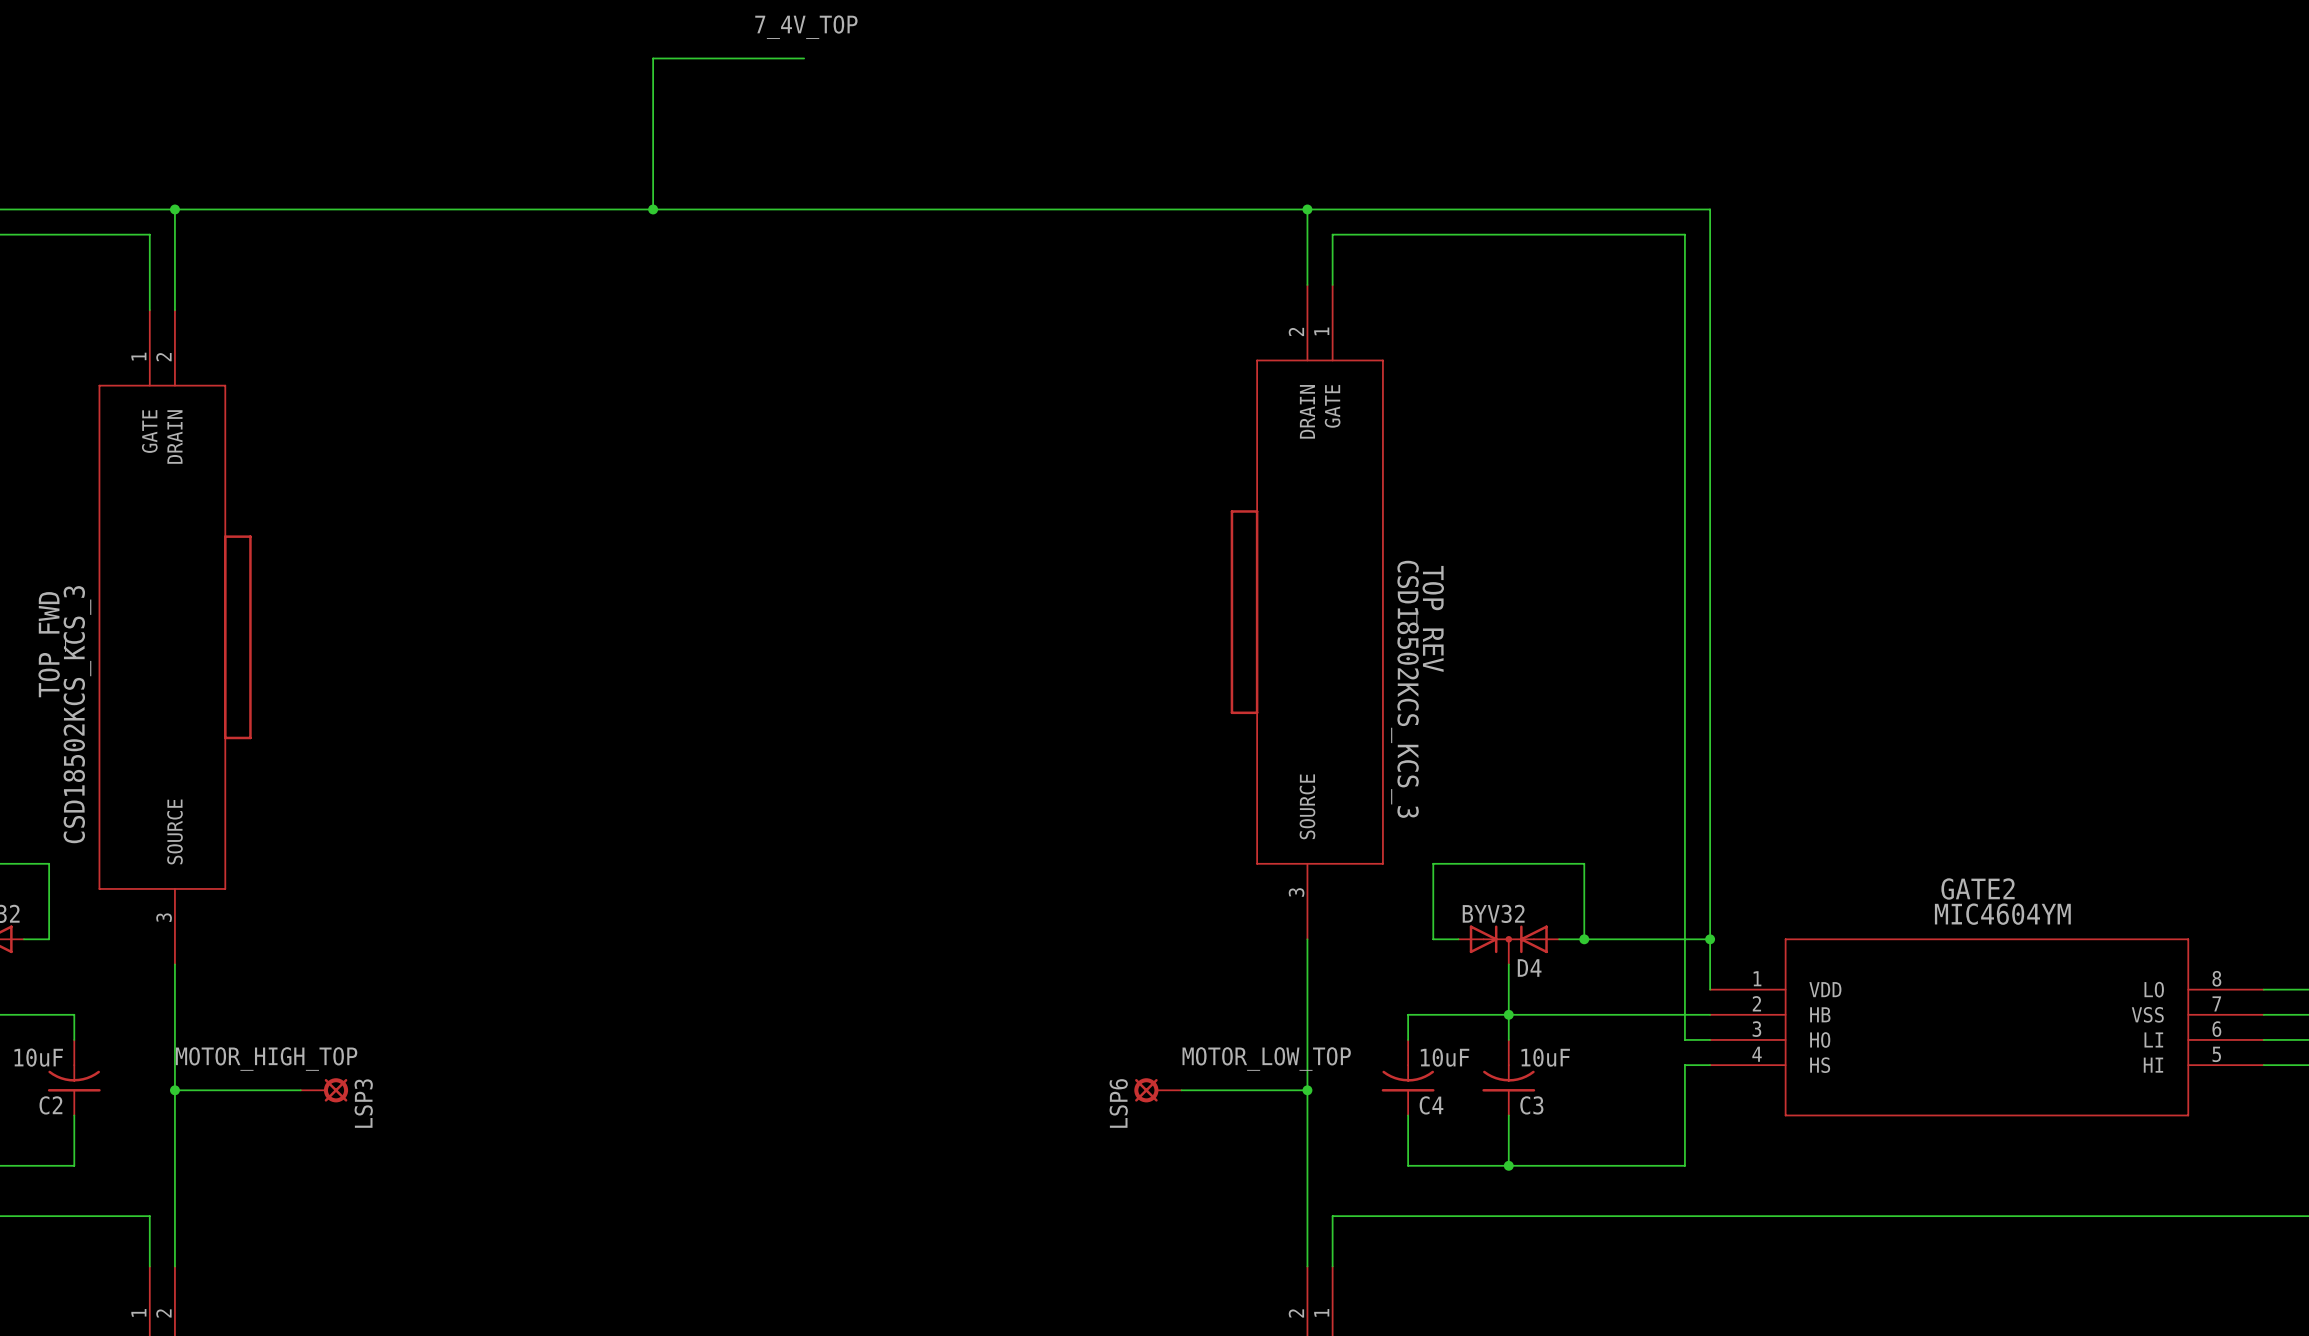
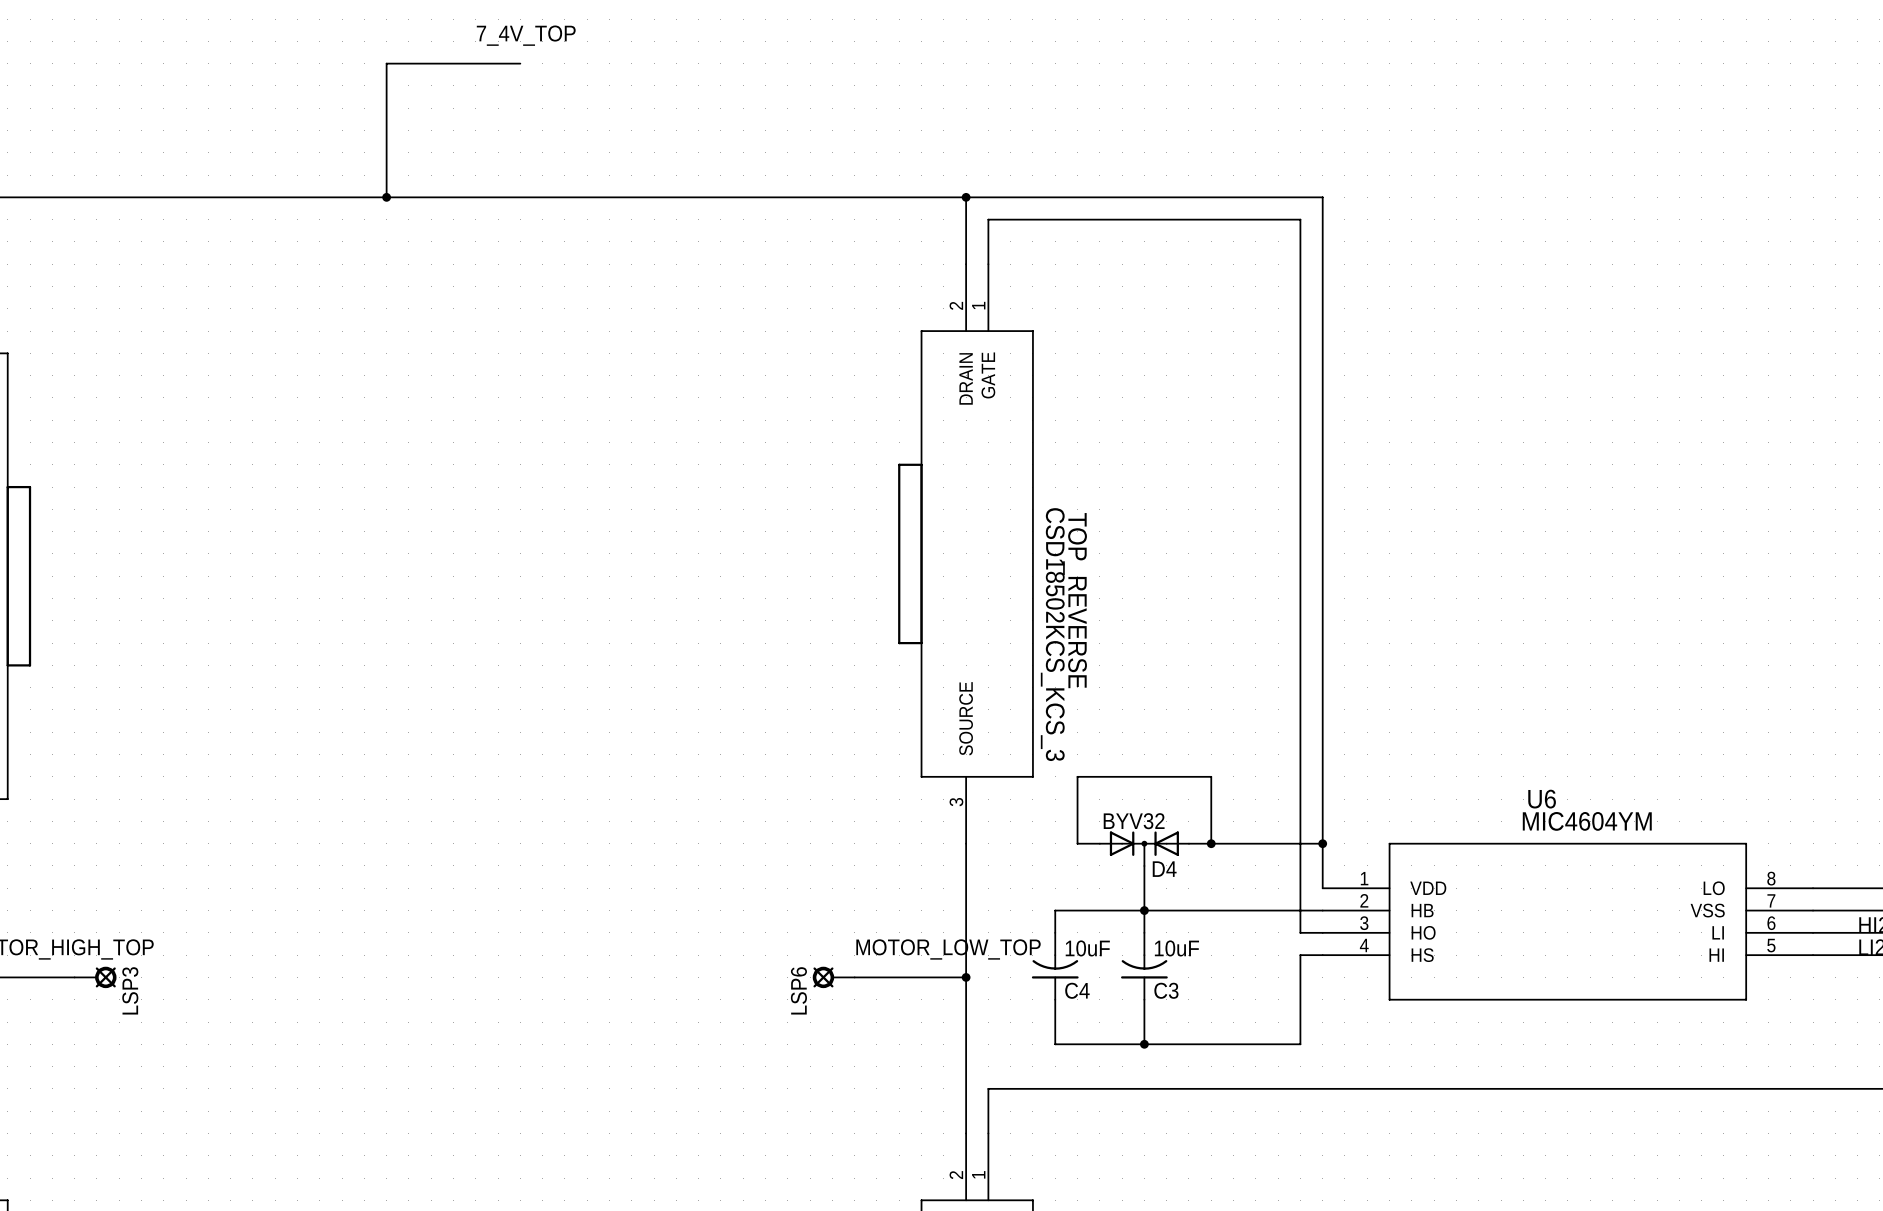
TOP_REV name: TOP_REV (1430, 618) -> TOP_REVERSE (1075, 600)
GATE2 name: GATE2 (1978, 888) -> U6 (1542, 799)

